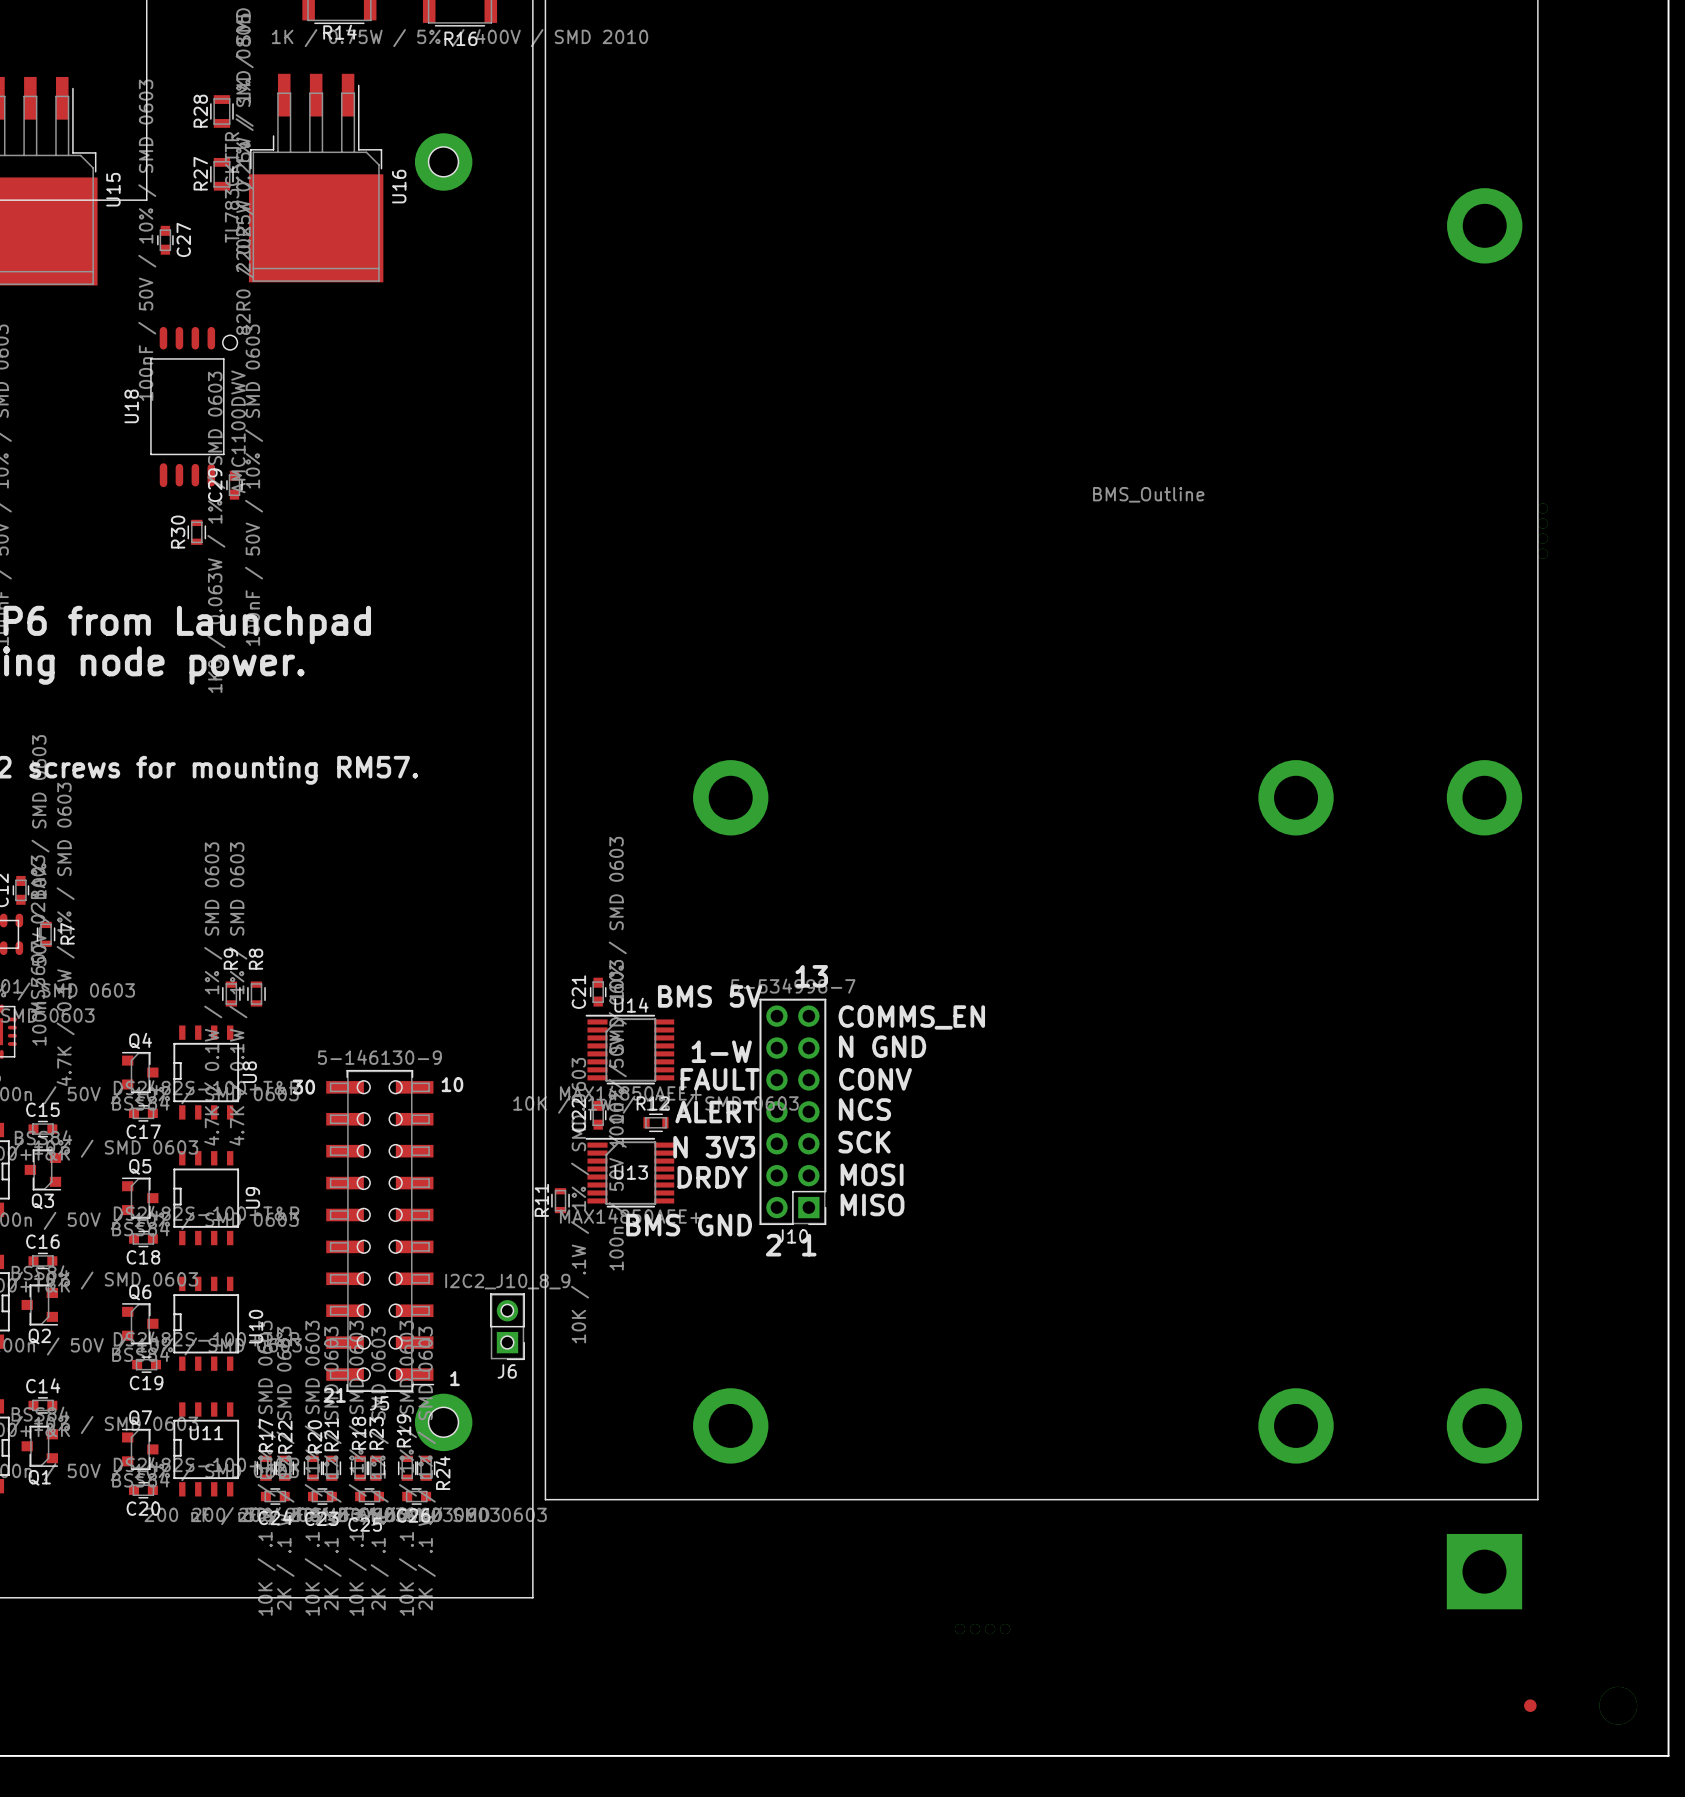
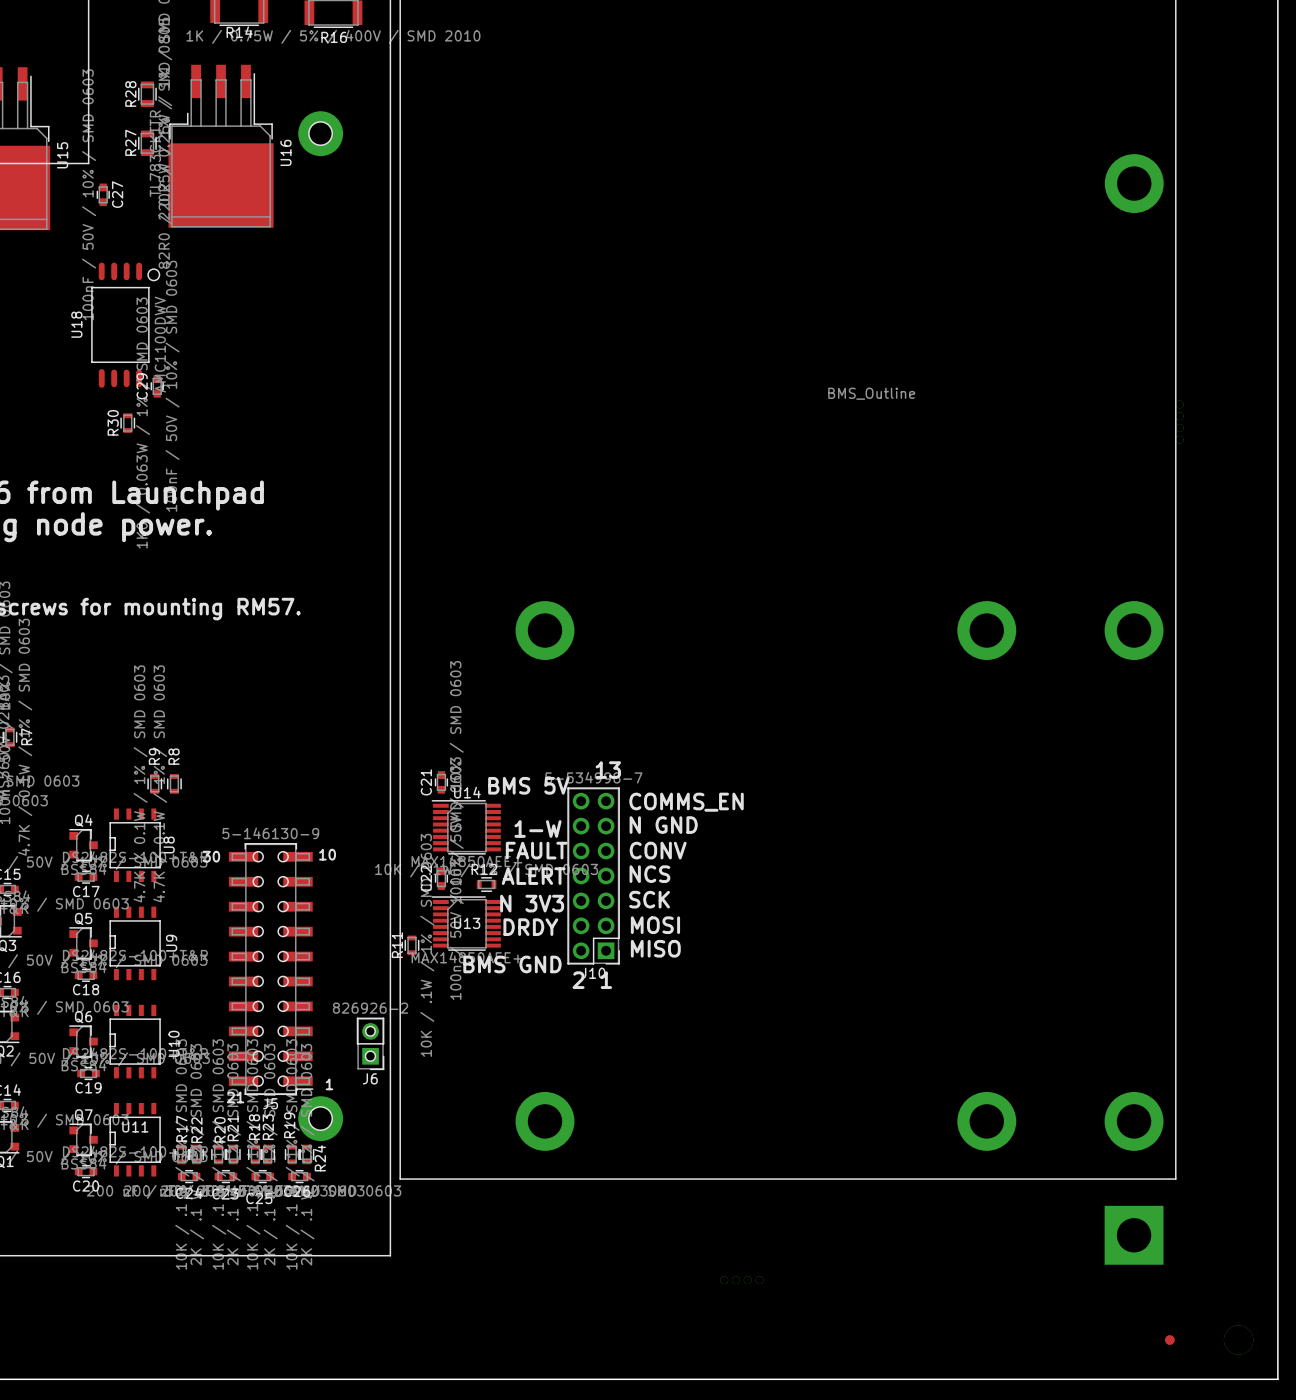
J6 value: I2C2_J10_8_9 (507, 1281) -> 826926-2 (370, 1008)

